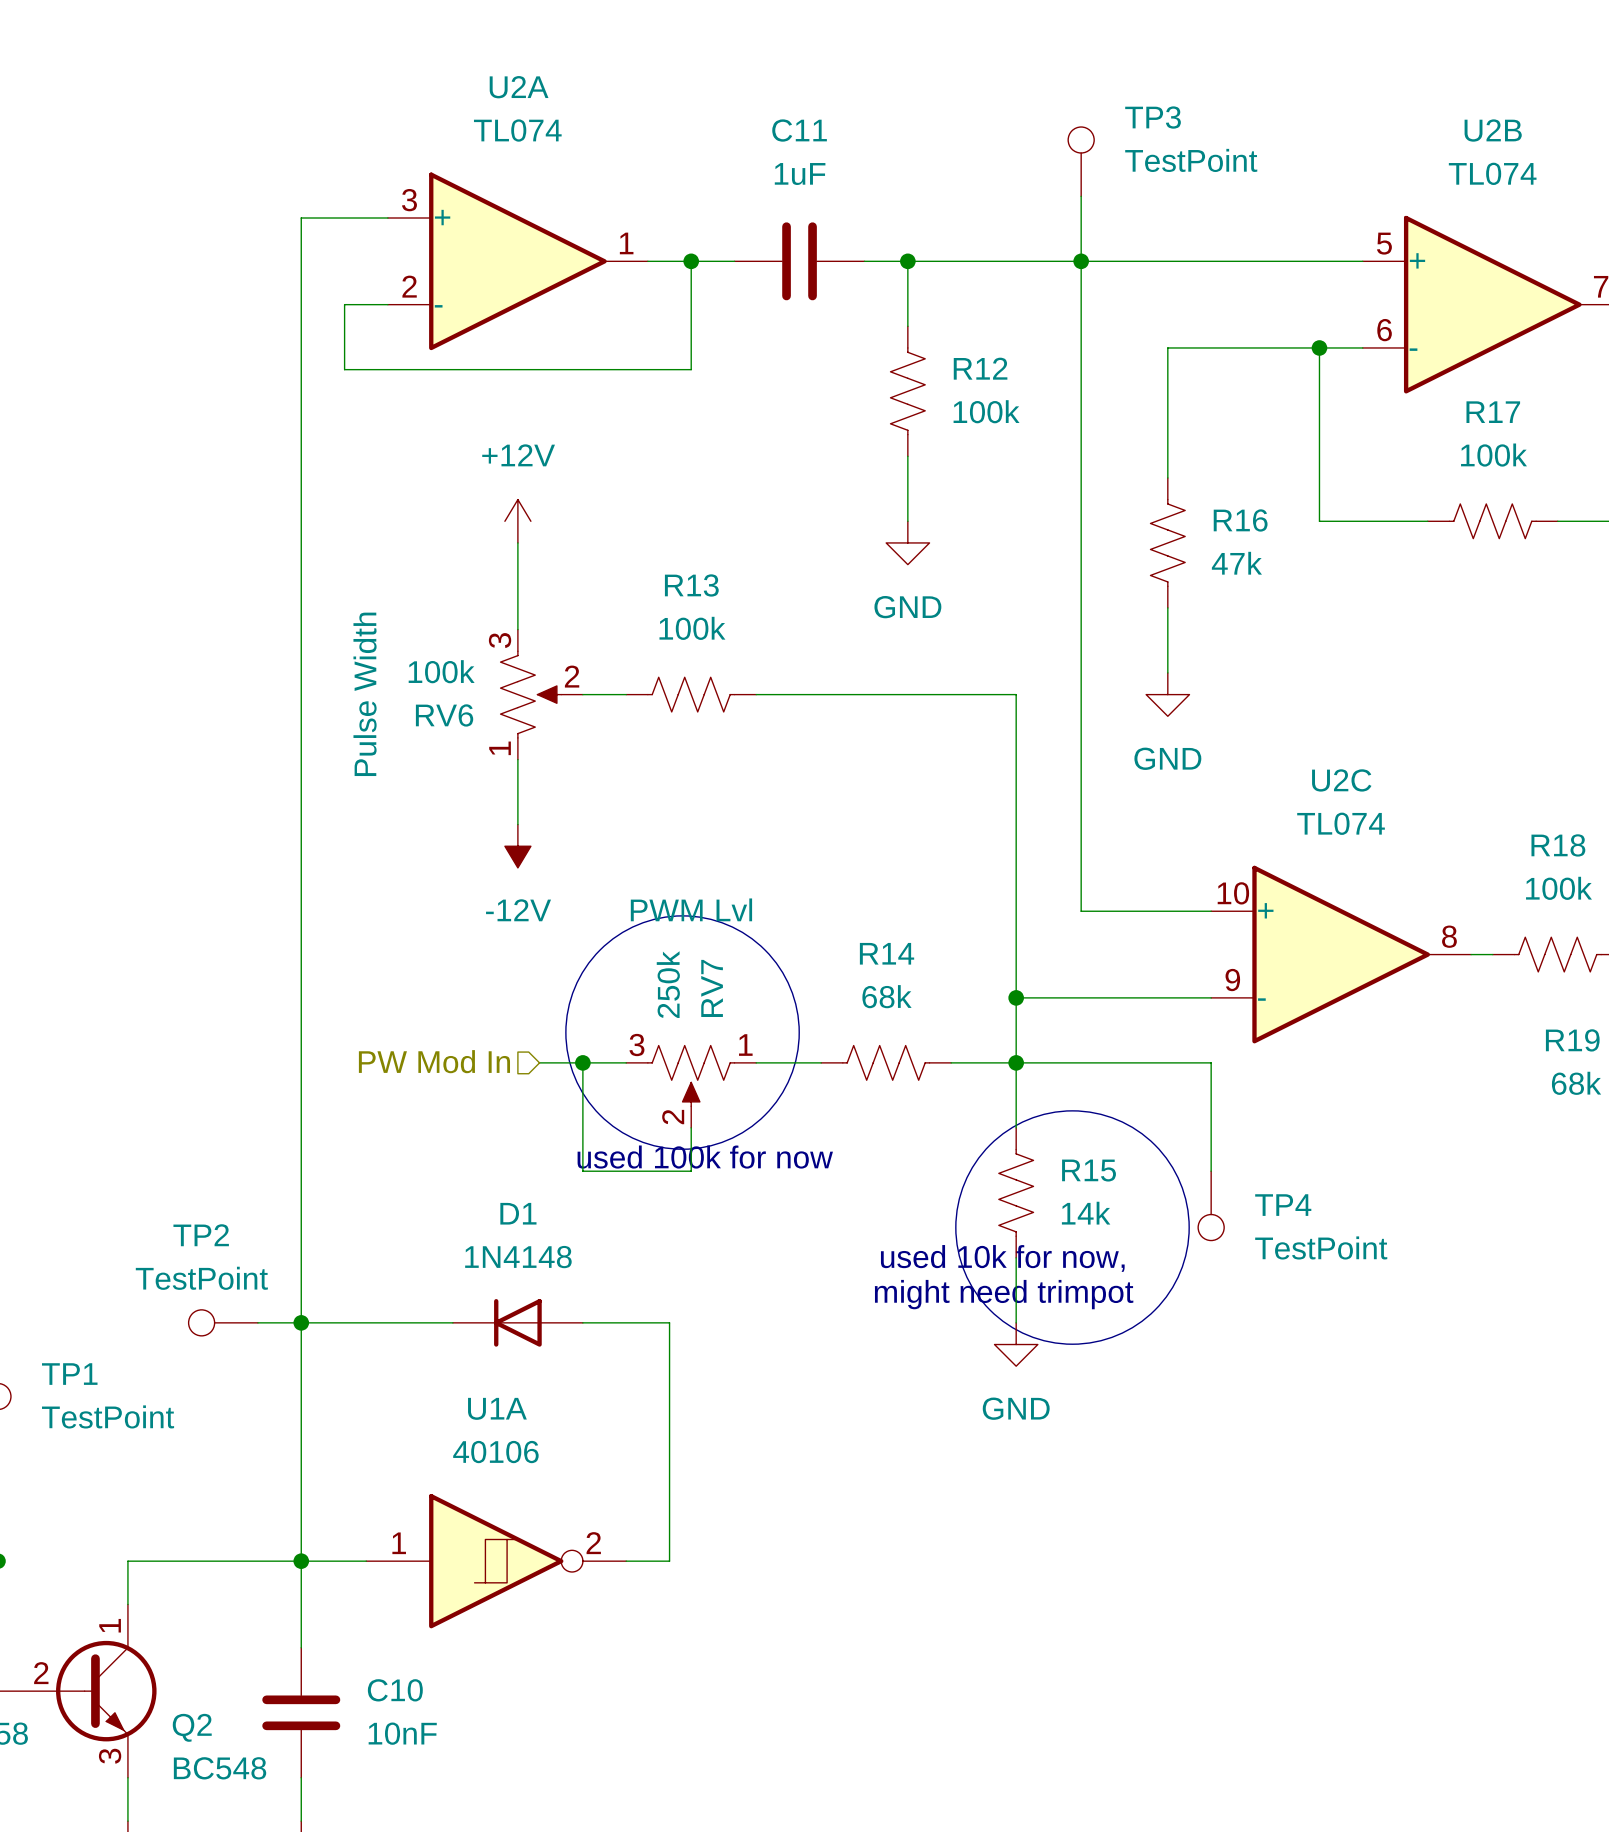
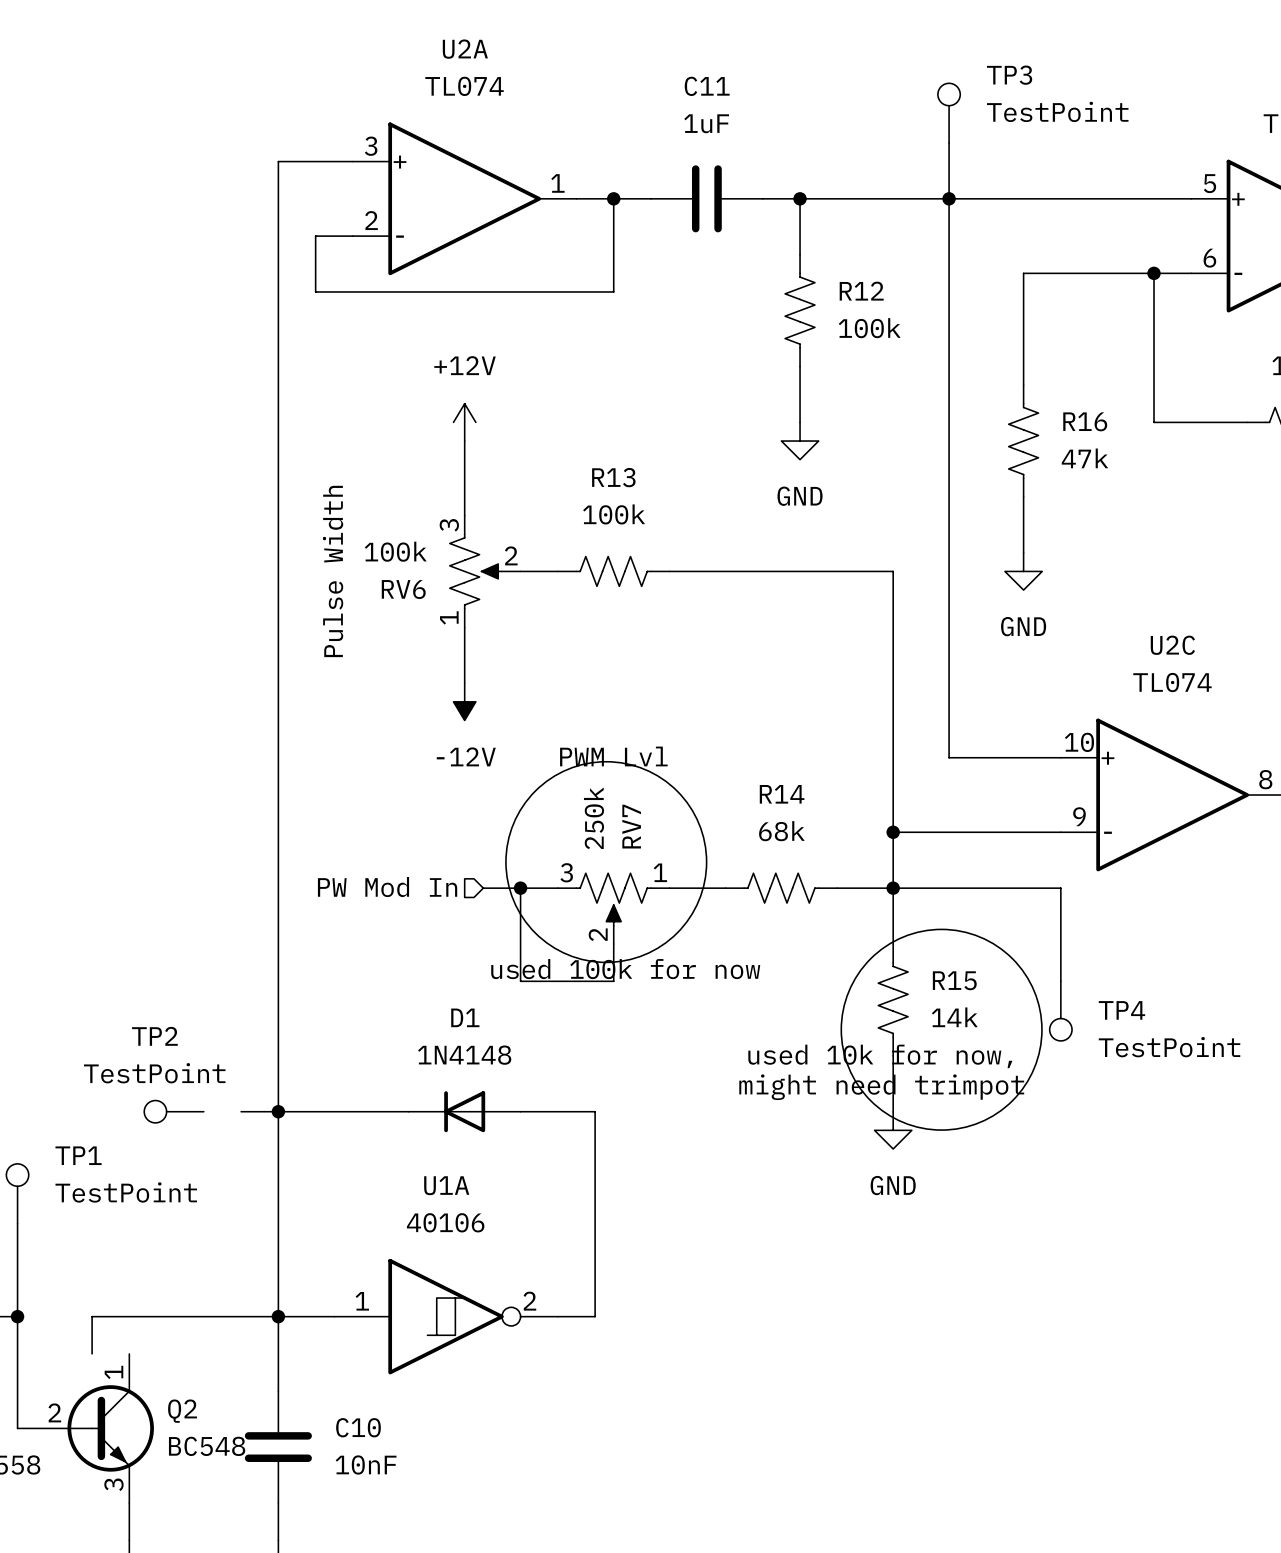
TP2 position: (223, 1322) -> (174, 1111)
wire: (127, 1561) (127, 1604) -> (129, 1316) (92, 1316) (92, 1353)
Q2 name position: Q2 (192, 1727) -> Q2 (182, 1411)
Q2 value position: BC548 (220, 1768) -> BC548 (207, 1446)

